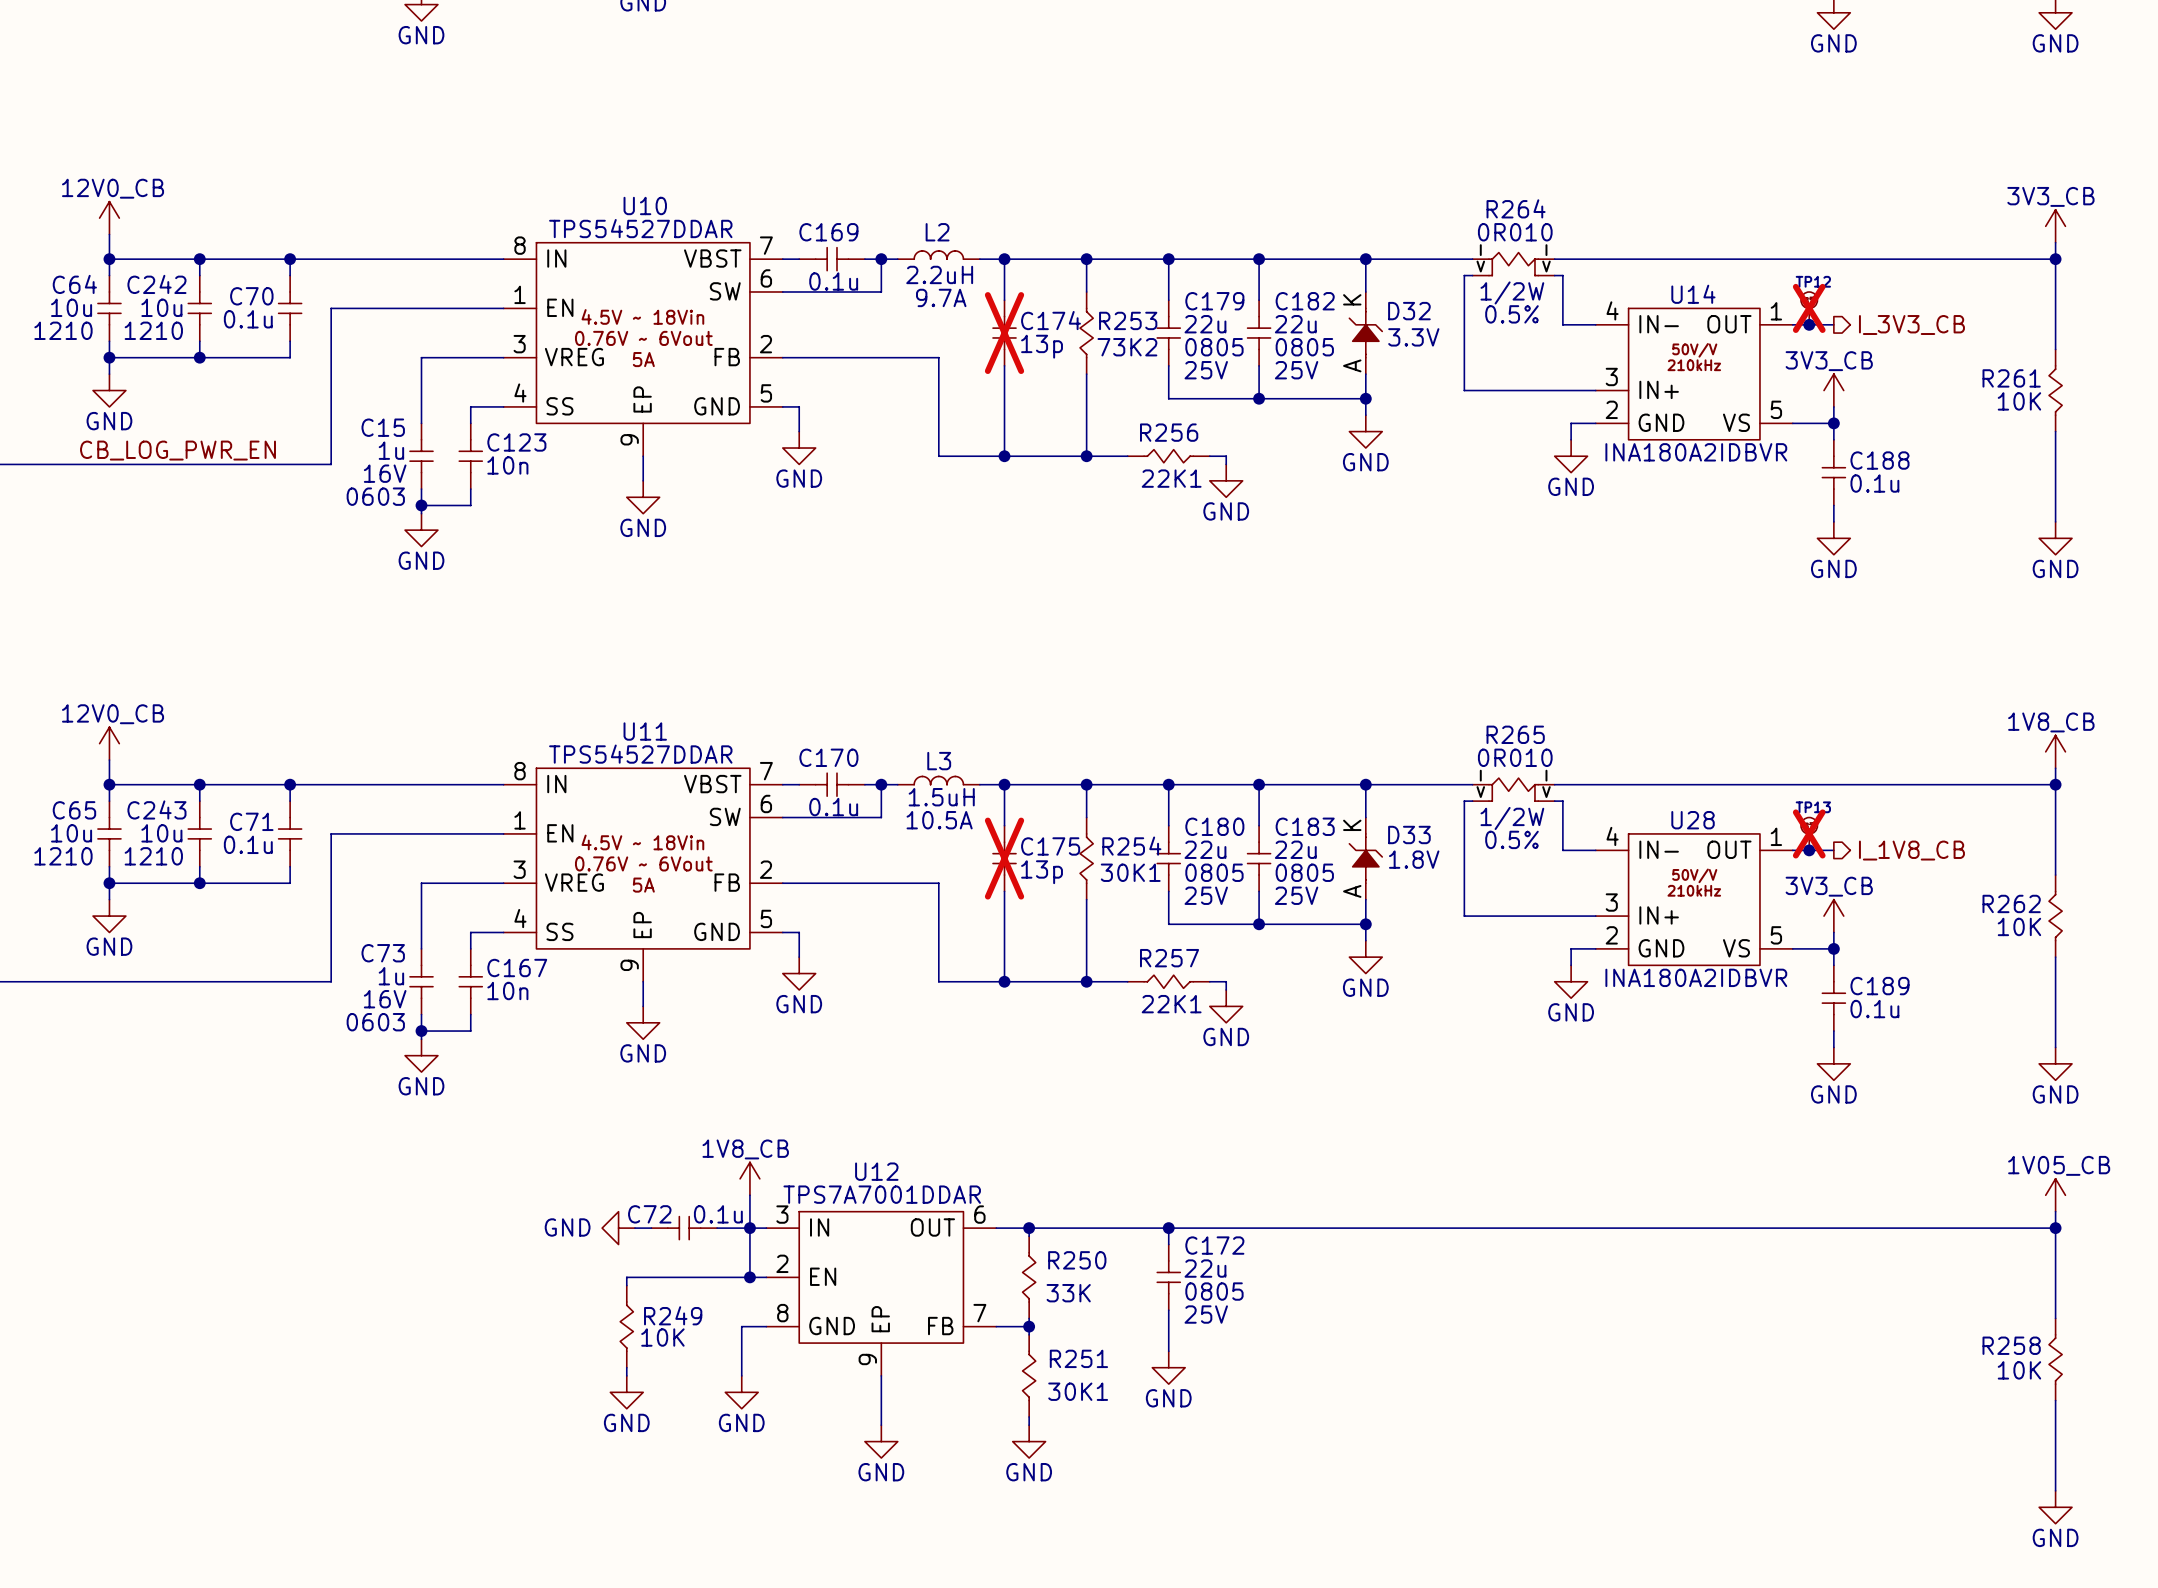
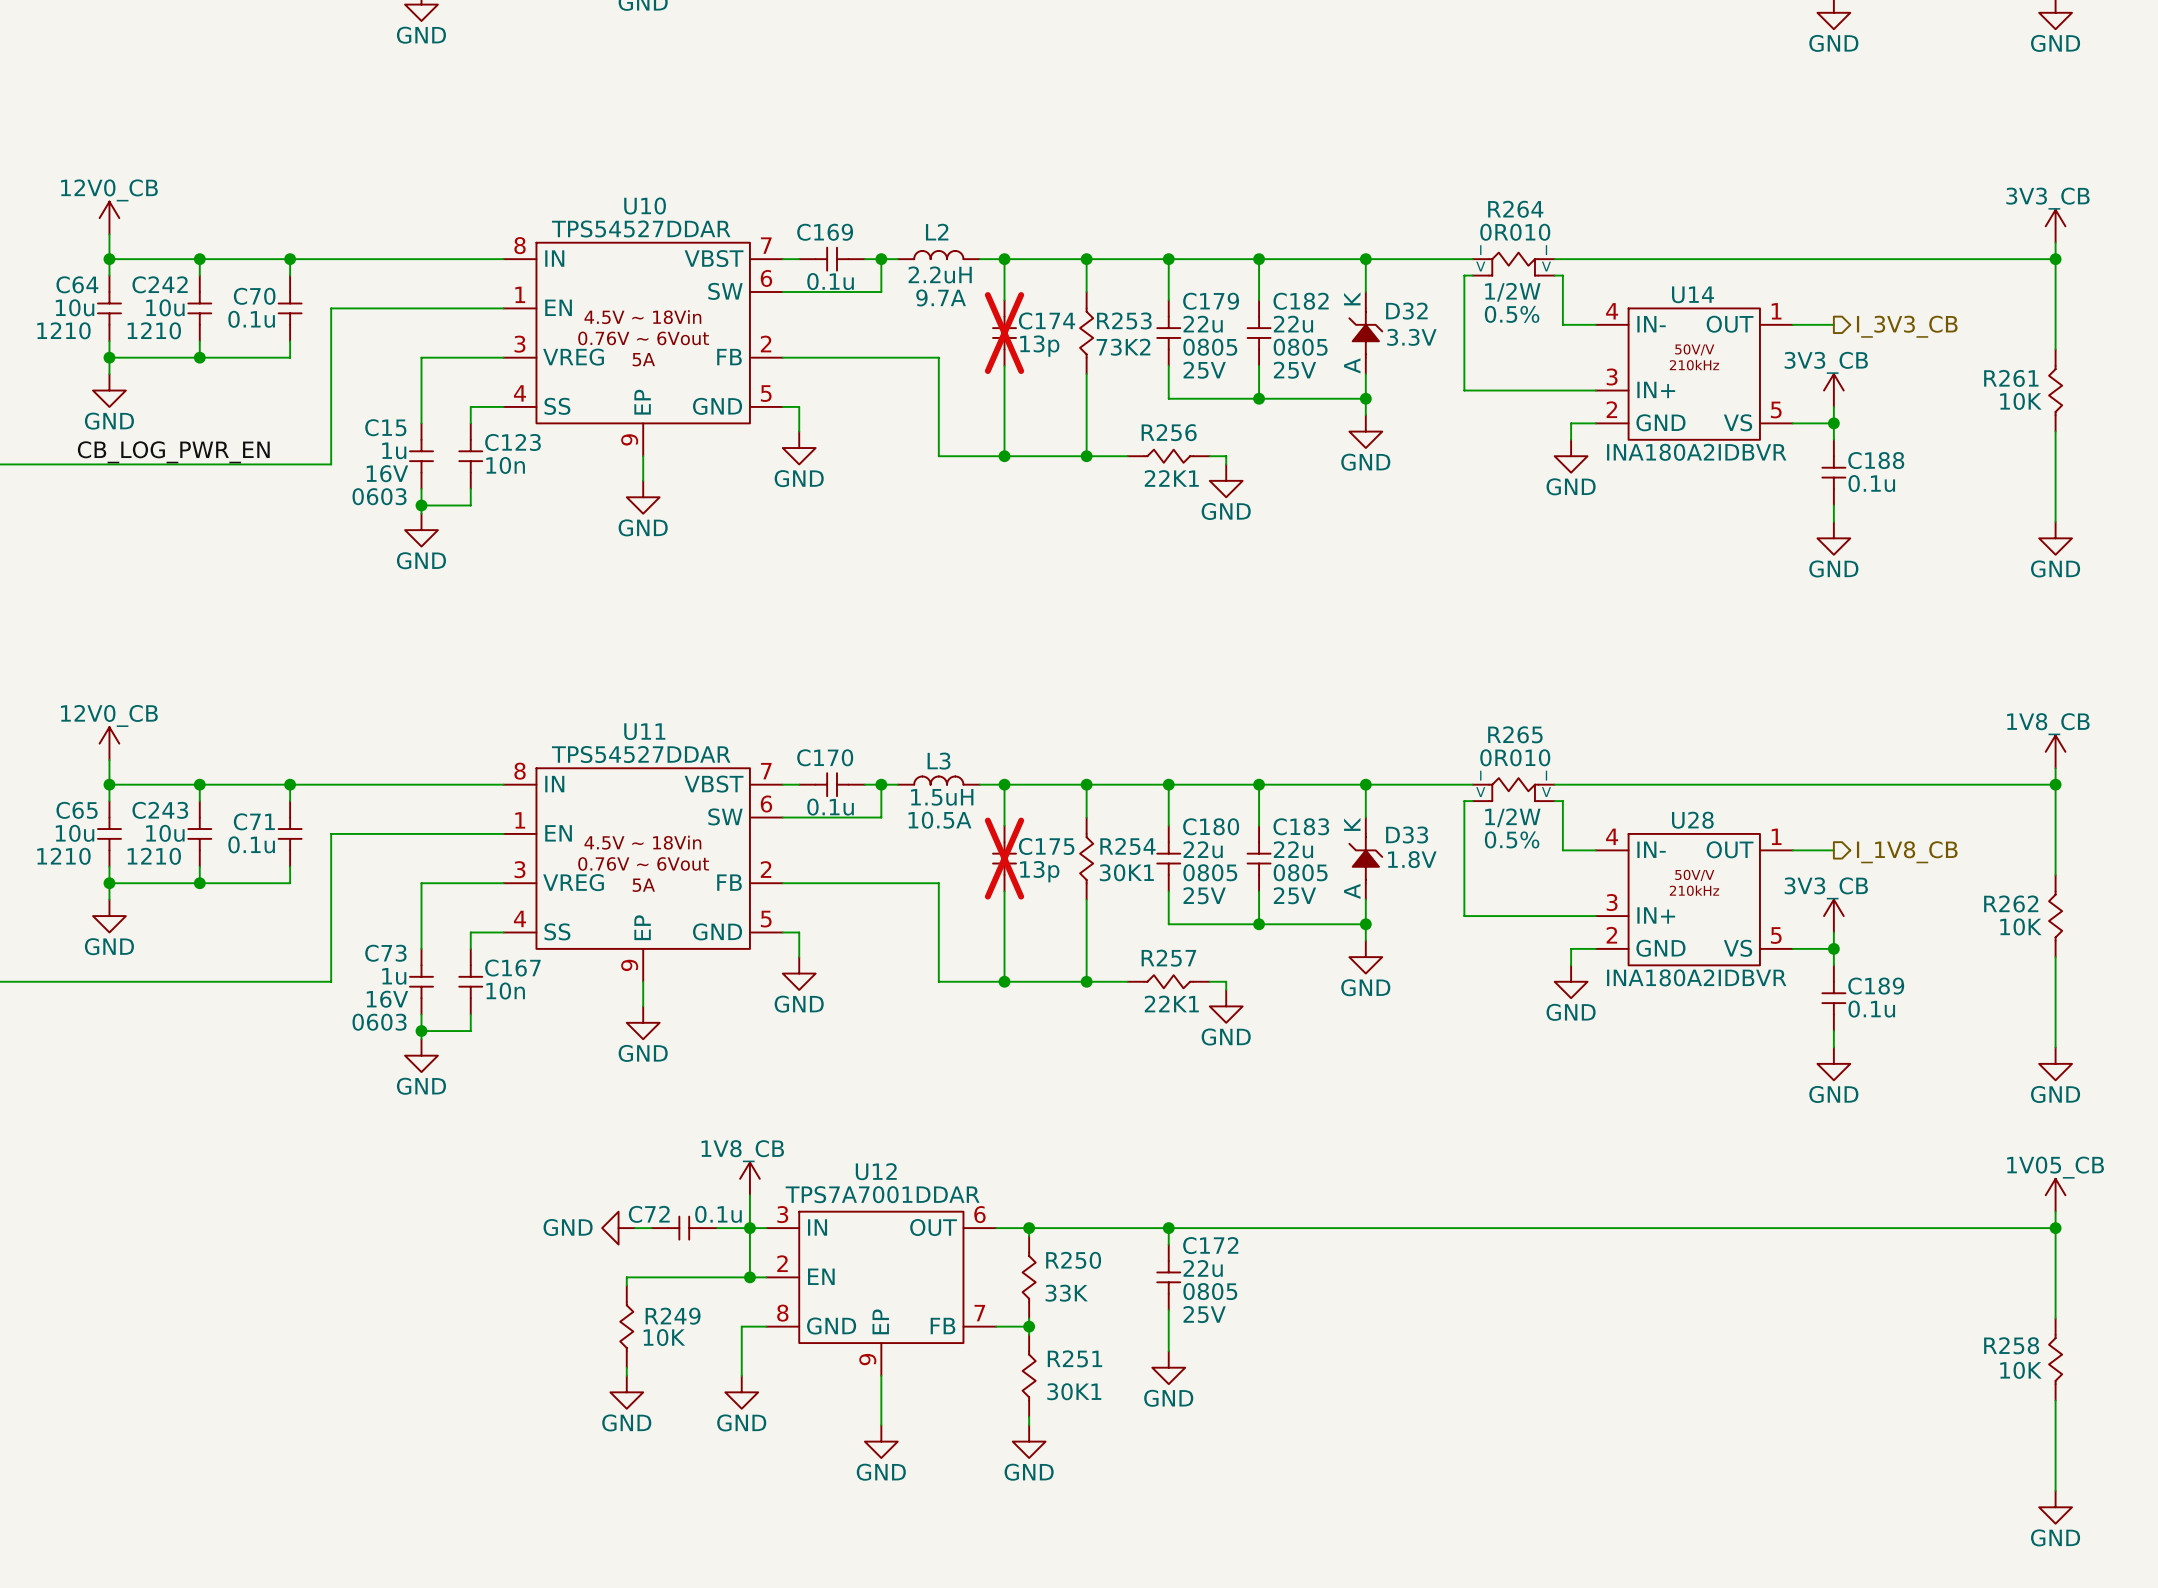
TP12: (1809, 308) -> none
junction: (1809, 324) -> none
TP13: (1809, 833) -> none
junction: (1809, 850) -> none

